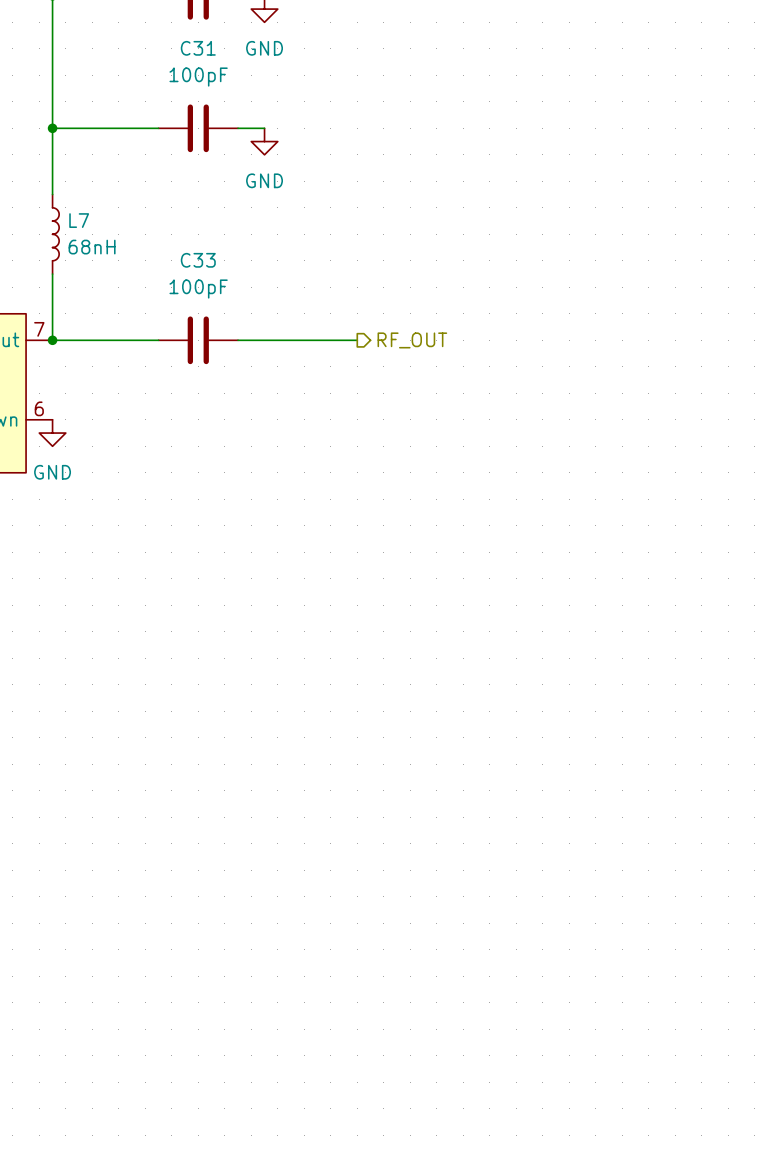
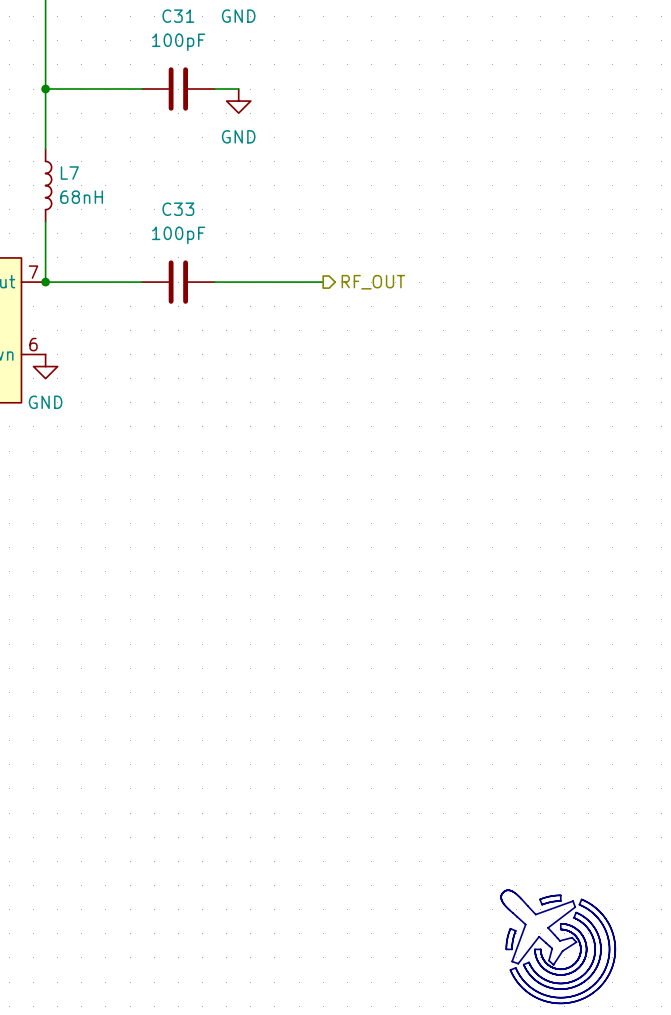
line: none -> (507, 890) (501, 894) (502, 901) (525, 924) (512, 961) (518, 963) (539, 936) (552, 948) (549, 960) (553, 964) (562, 951) (576, 942) (572, 937) (559, 940) (548, 927) (575, 907) (573, 901) (535, 914) (517, 894) (507, 890)
line: none -> (559, 895) (548, 896) (539, 899) (542, 904) (560, 901) (559, 895)
line: none -> (581, 899) (579, 904) (596, 916) (607, 934) (609, 951) (605, 968) (597, 980) (587, 989) (574, 995) (560, 997) (548, 996) (536, 991) (524, 981) (515, 967) (510, 970) (522, 987) (538, 998) (559, 1003) (580, 999) (598, 988) (610, 971) (615, 949) (611, 928) (599, 911) (581, 899)
line: none -> (576, 912) (573, 917) (585, 925) (593, 938) (595, 951) (592, 963) (579, 977) (561, 983) (551, 982) (541, 977) (529, 962) (523, 964) (532, 977) (544, 985) (559, 989) (575, 986) (588, 978) (597, 965) (600, 950) (598, 935) (589, 921) (576, 912)
line: none -> (560, 923) (560, 929) (572, 933) (579, 942) (580, 953) (575, 963) (565, 968) (554, 968) (544, 960) (540, 949) (535, 949) (536, 959) (542, 967) (550, 973) (560, 974) (570, 973) (579, 967) (584, 959) (586, 949) (584, 939) (579, 931) (570, 925) (560, 923)
line: none -> (510, 928) (507, 938) (506, 949) (512, 949) (515, 930) (510, 928)

